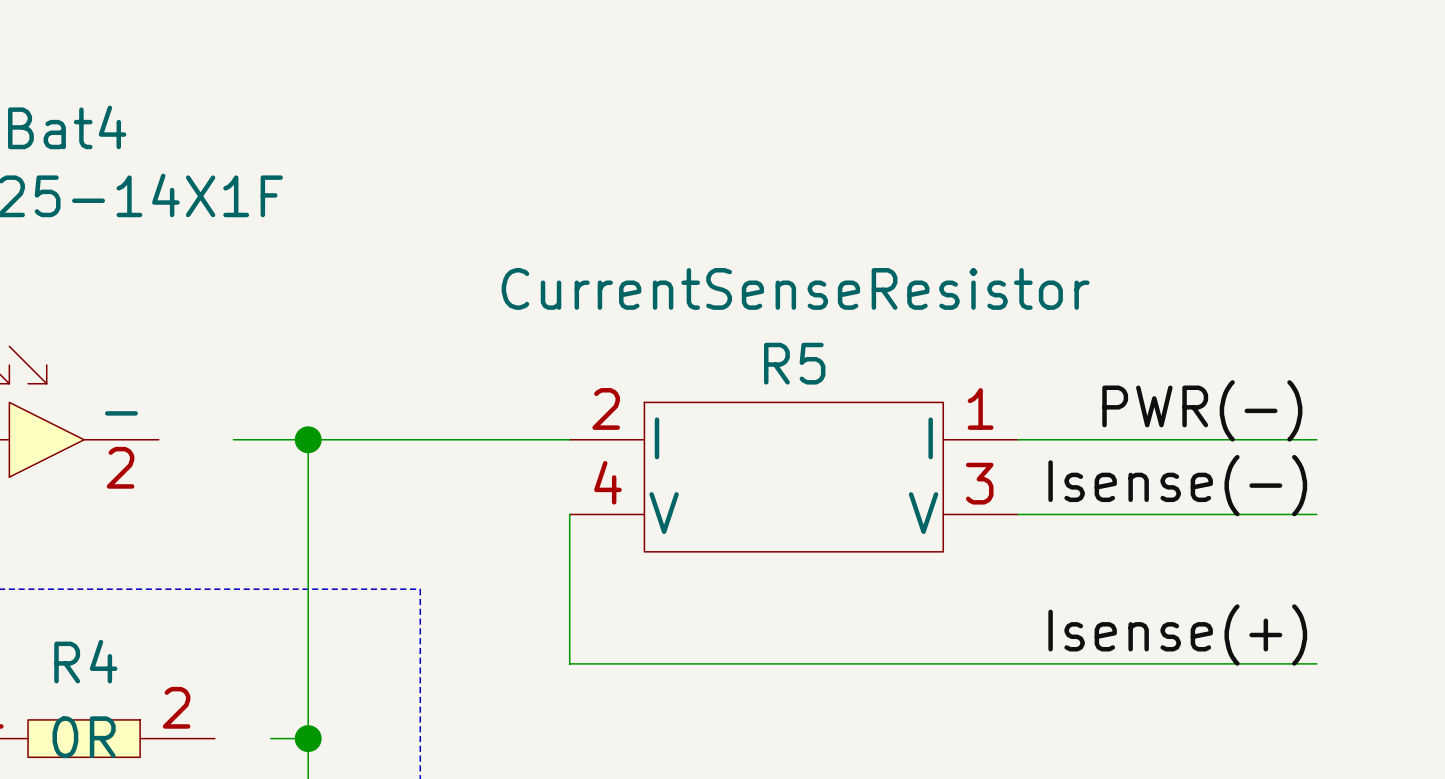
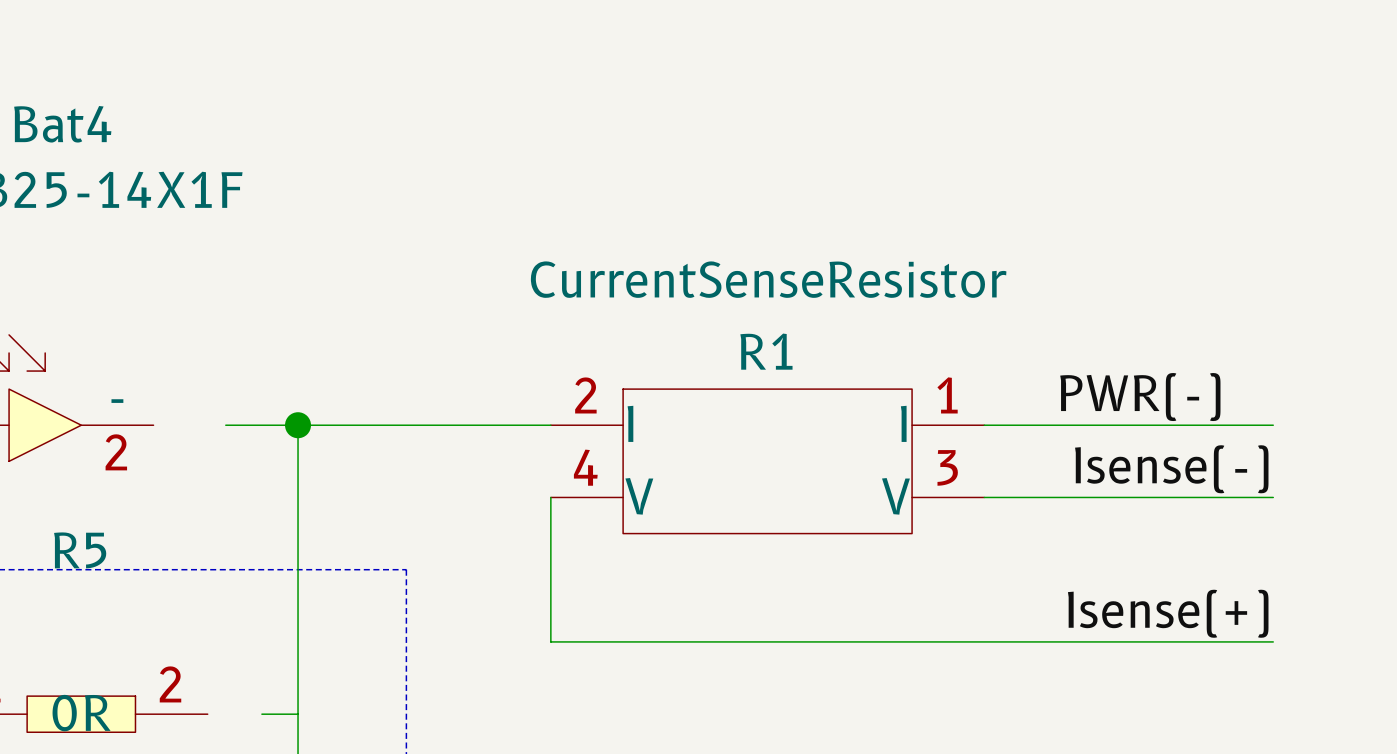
R5 name: R5 (794, 363) -> R1 (766, 351)
R4 name: R4 (85, 661) -> R5 (80, 550)
junction: (308, 738) -> none

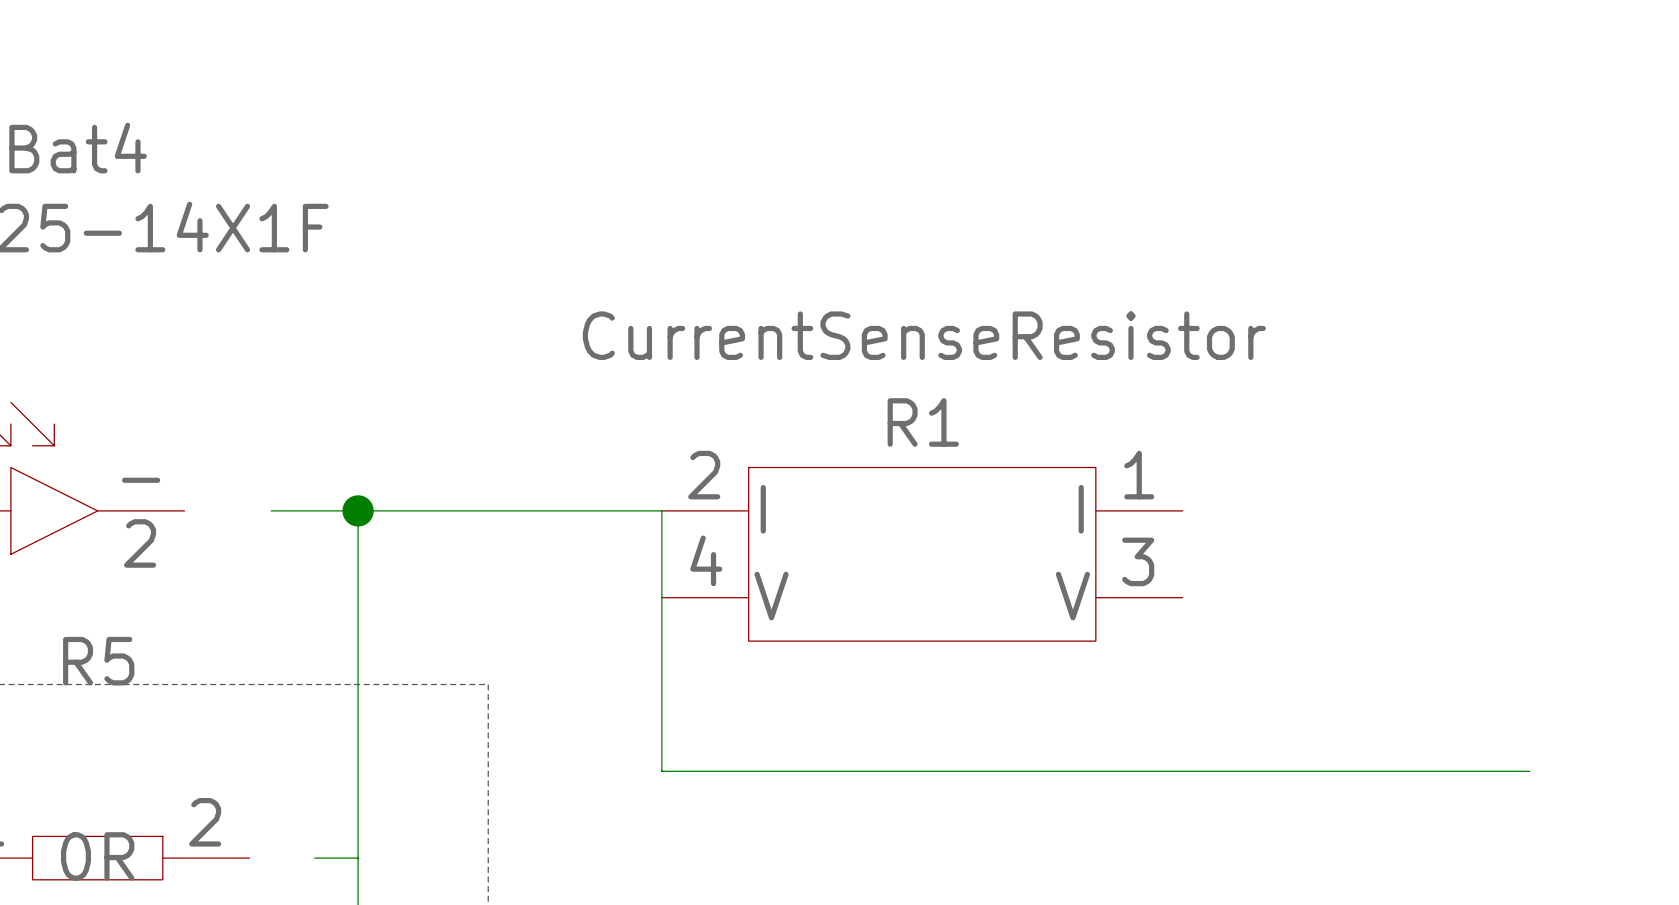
label: PWR(-) (1140, 397) -> none
wire: none -> (661, 510) (661, 597)
wire: (984, 425) (1273, 425) -> none
label: Isense(-) (1171, 469) -> none
wire: (984, 497) (1273, 497) -> none
label: Isense(+) (1168, 613) -> none

